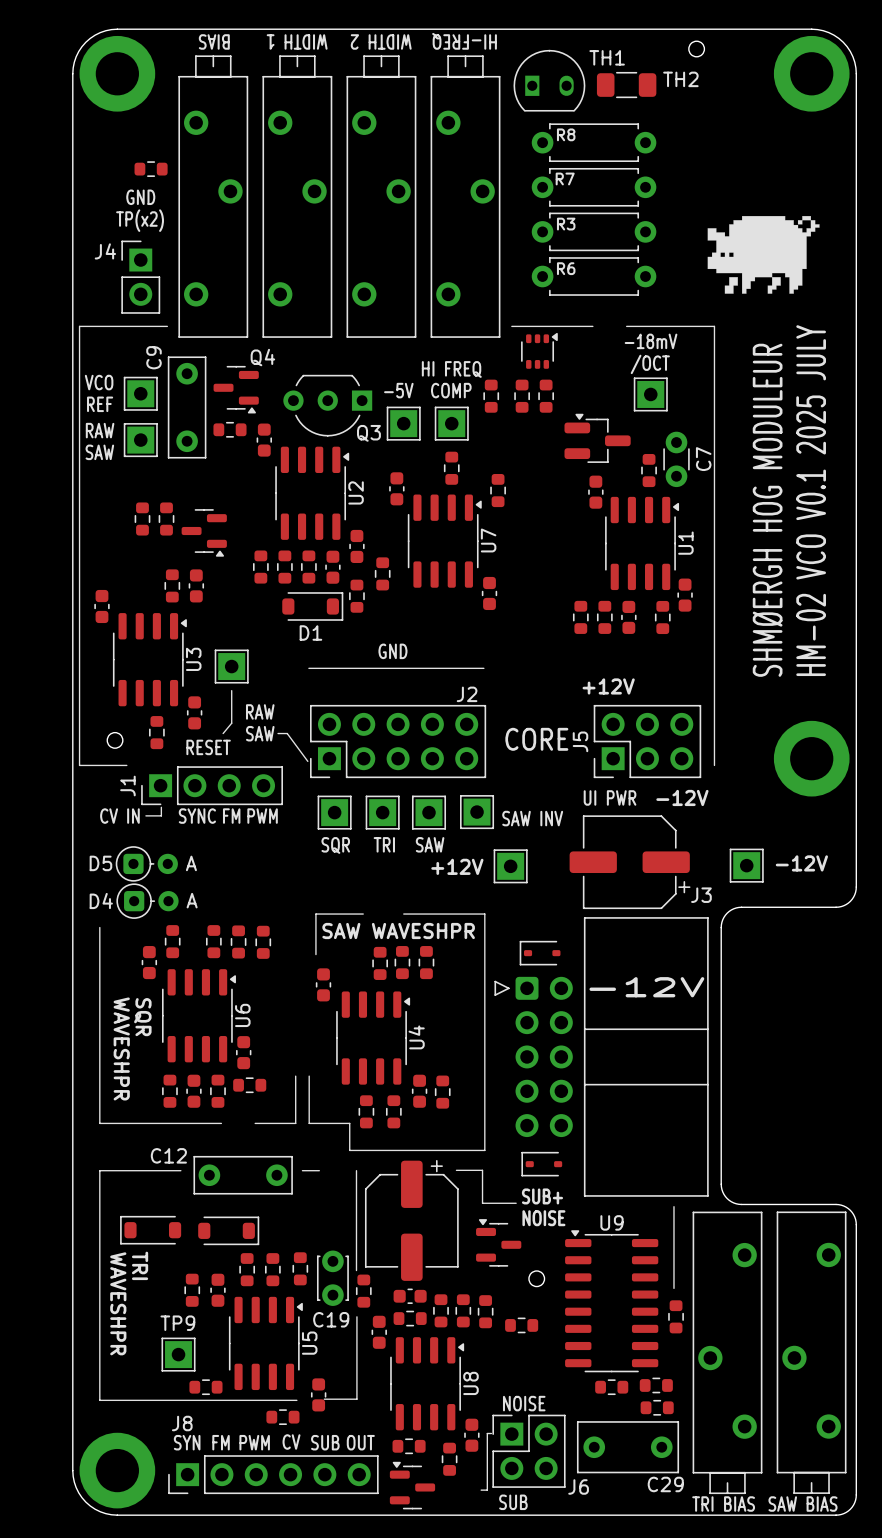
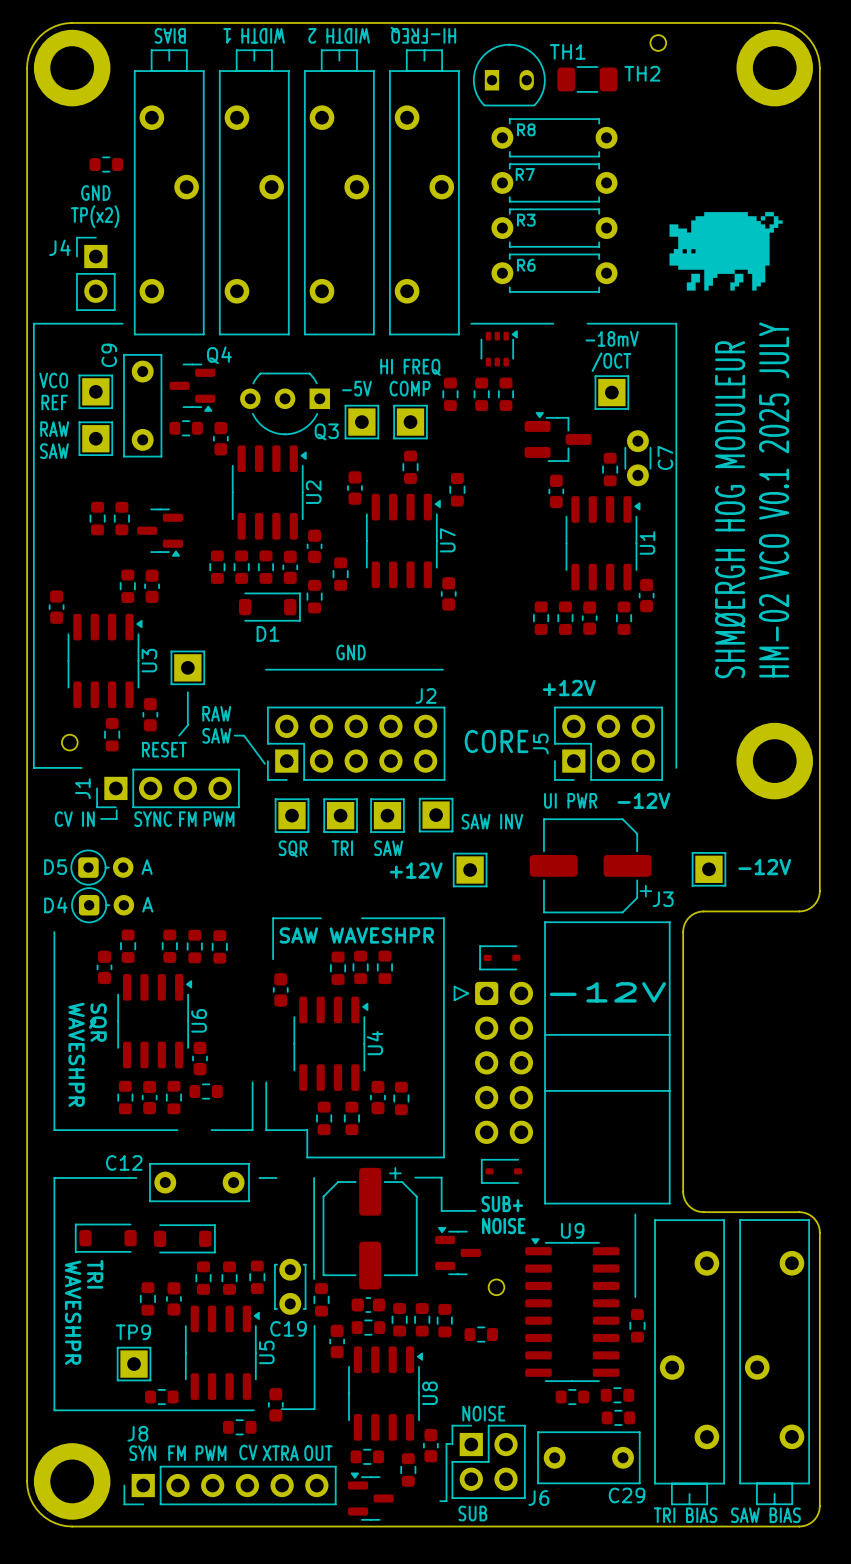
text: SUB (325, 1442) -> XTRA (280, 1453)

